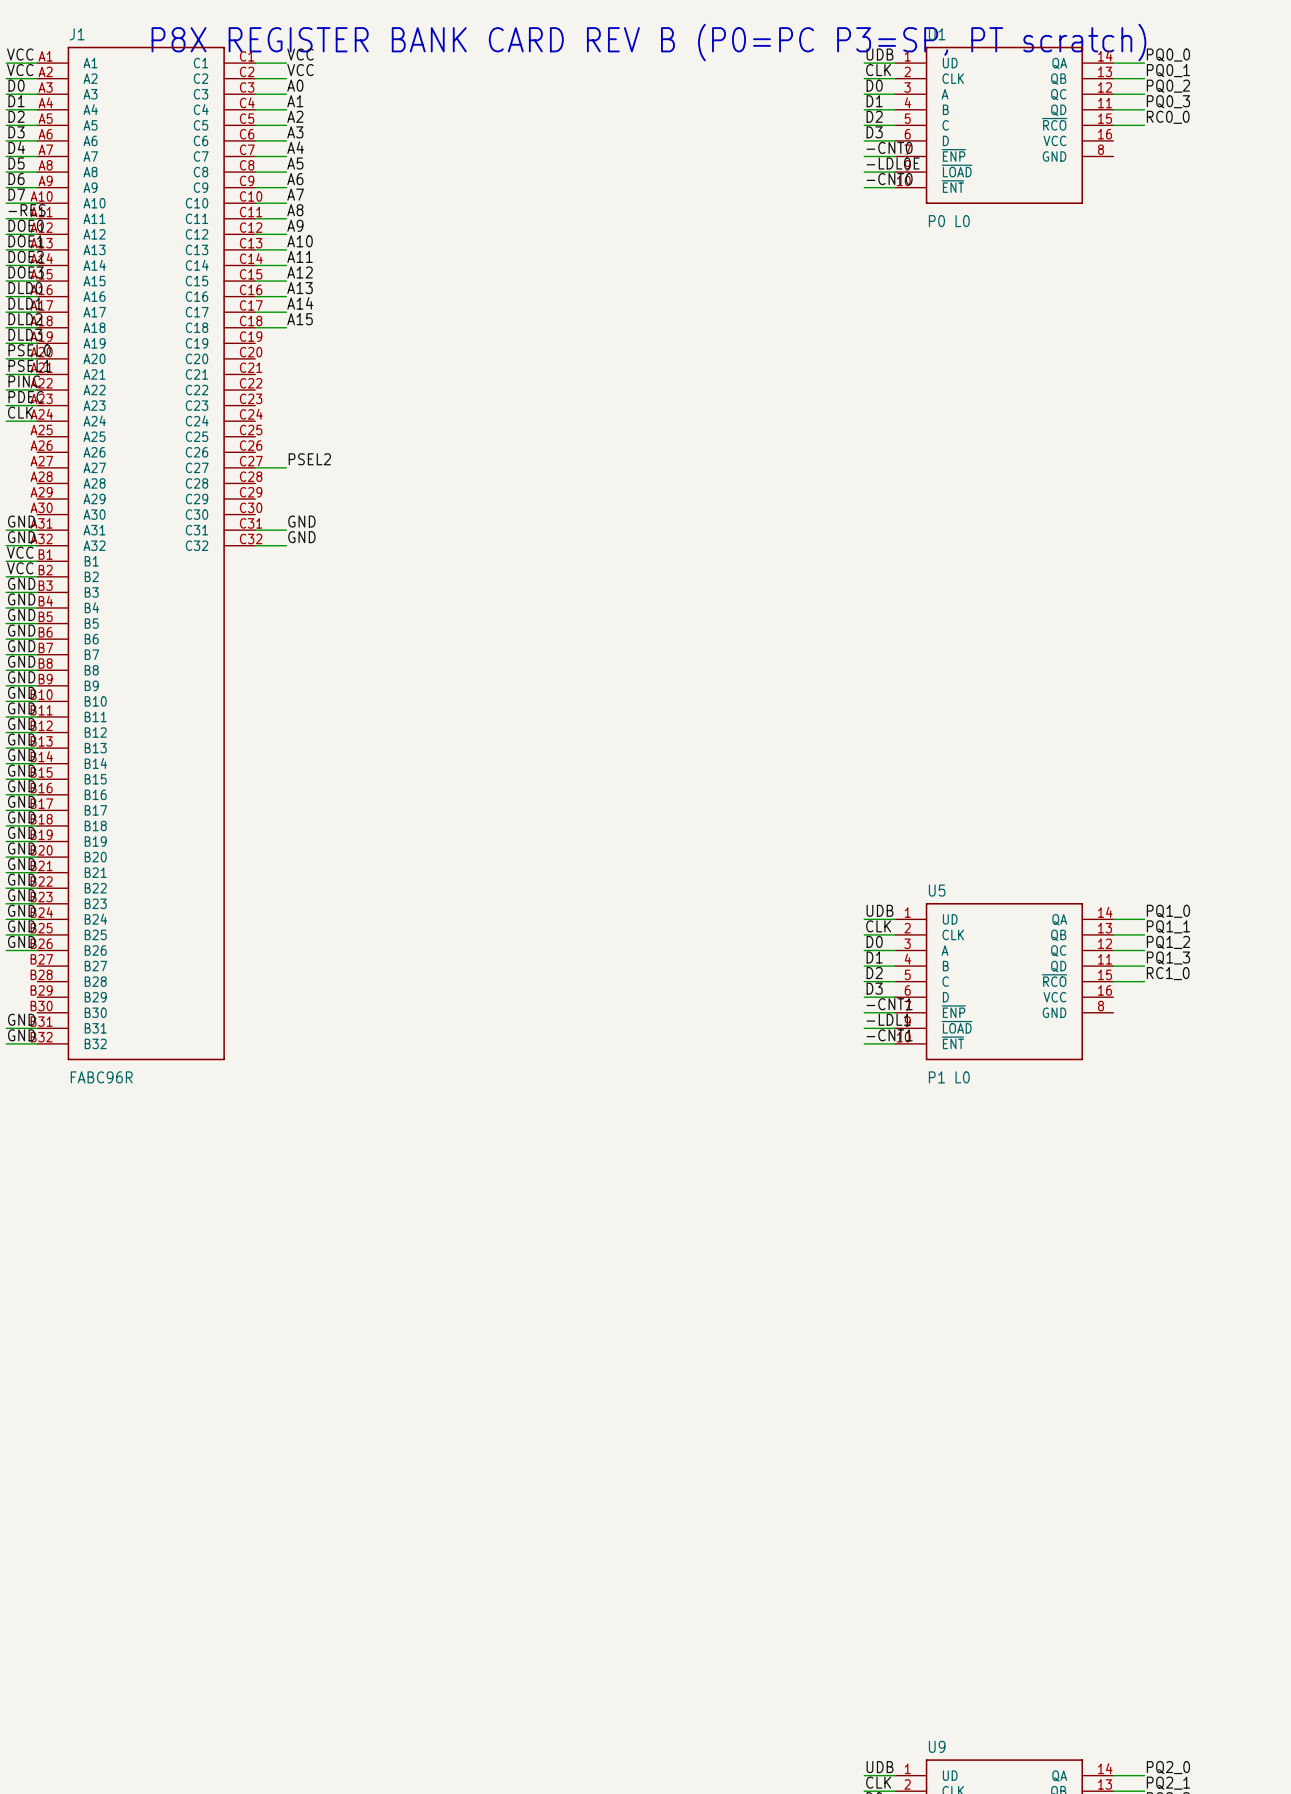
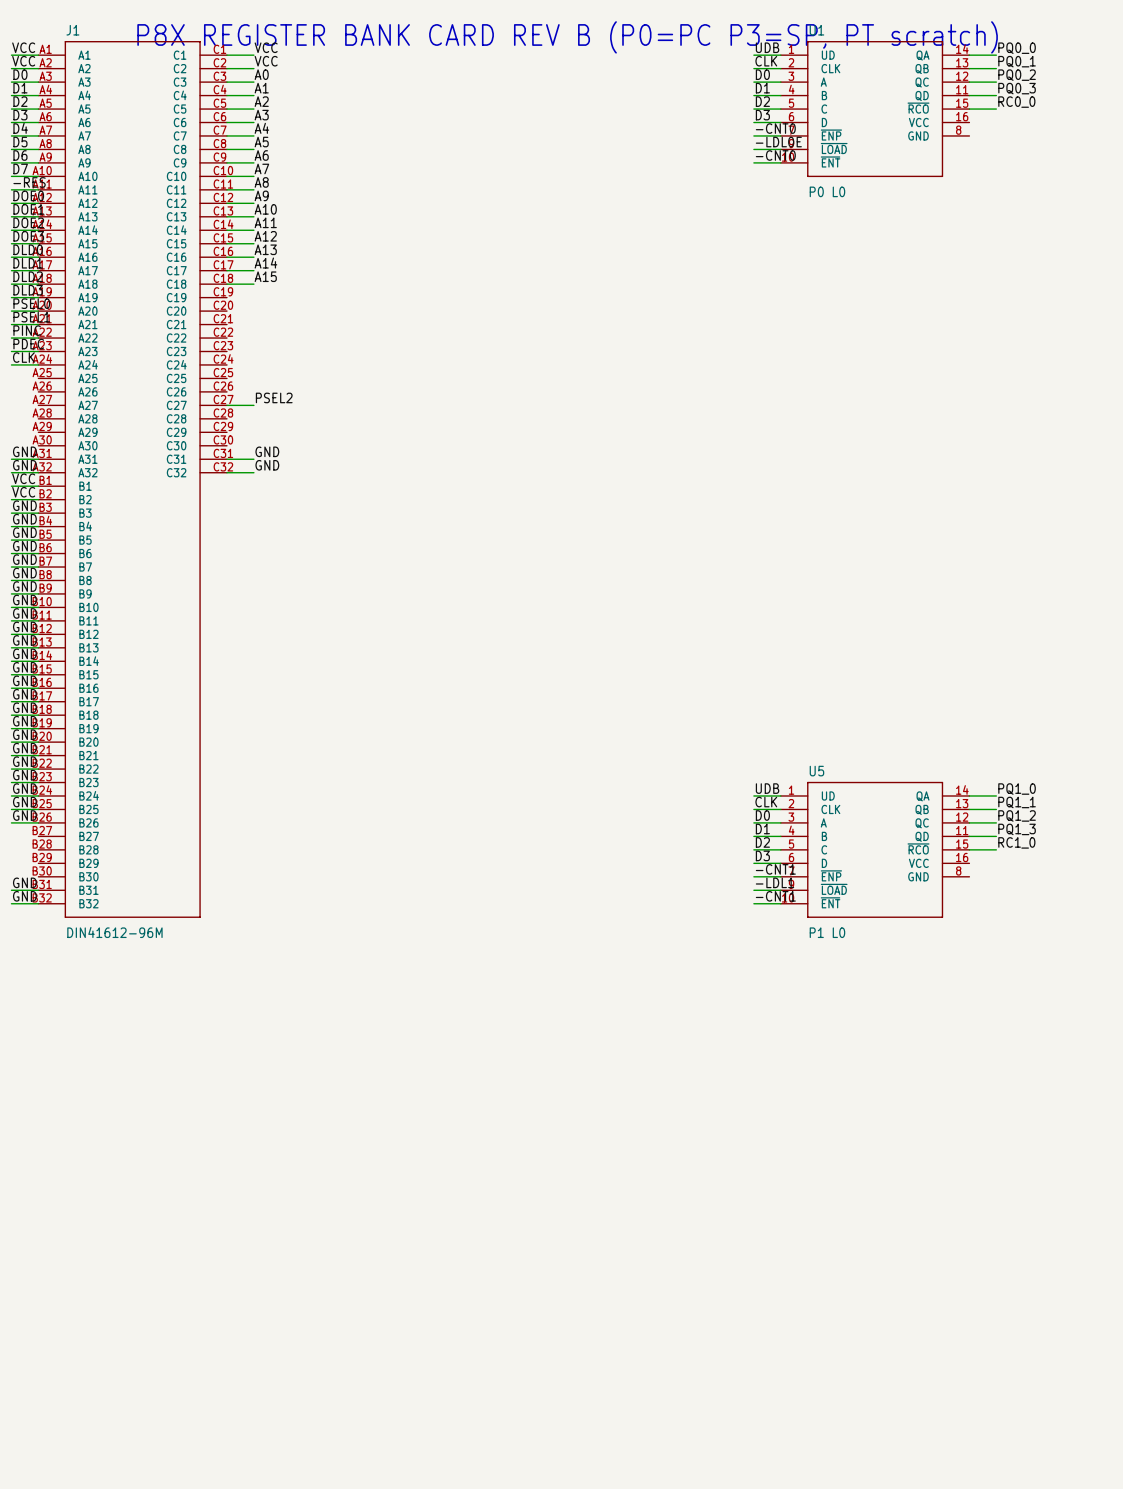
J1 value: FABC96R (101, 1077) -> DIN41612-96M (114, 932)

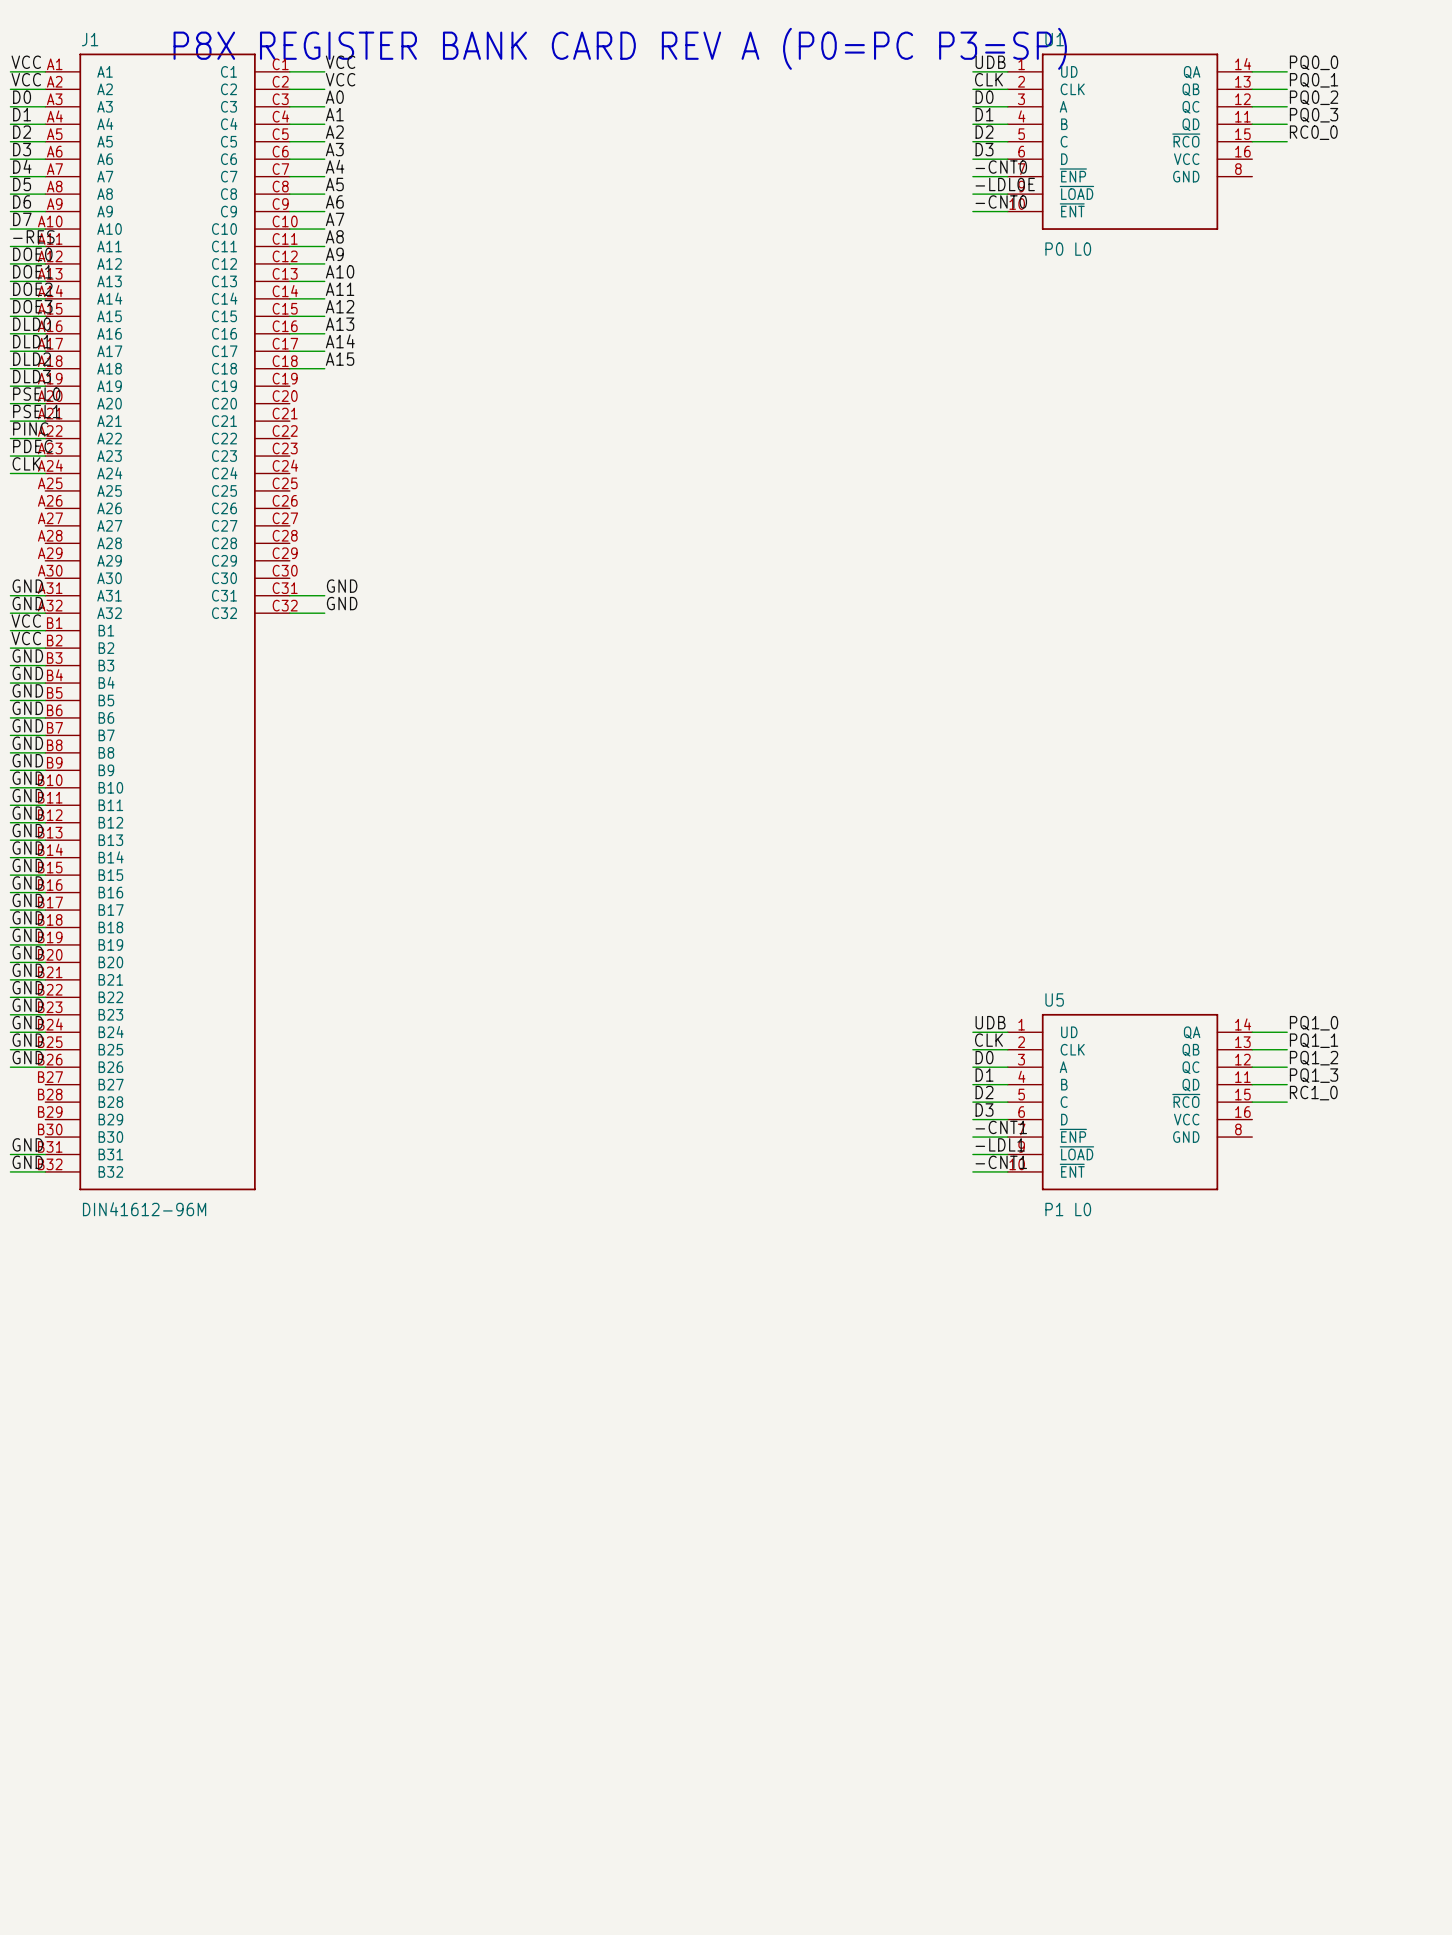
text: P8X REGISTER BANK CARD REV B (P0=PC P3=SP, PT scratch) (567, 37) -> P8X REGISTER BANK CARD REV A (P0=PC P3=SP) (620, 48)
label: PSEL2 (274, 397) -> none
wire: (226, 405) (253, 405) -> none

